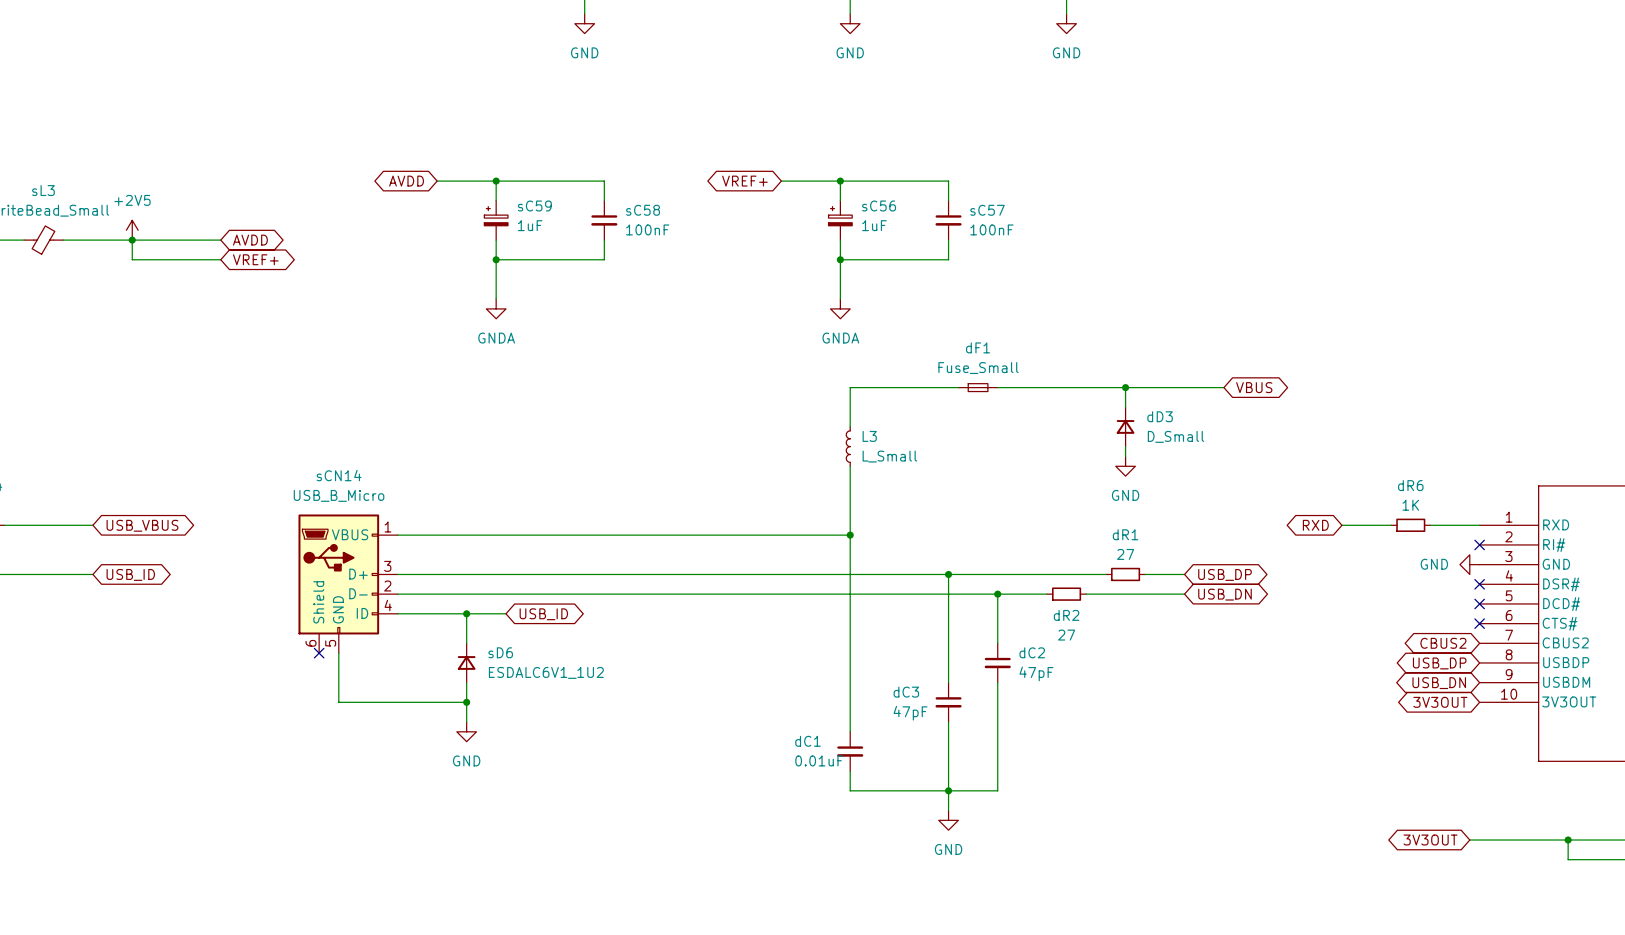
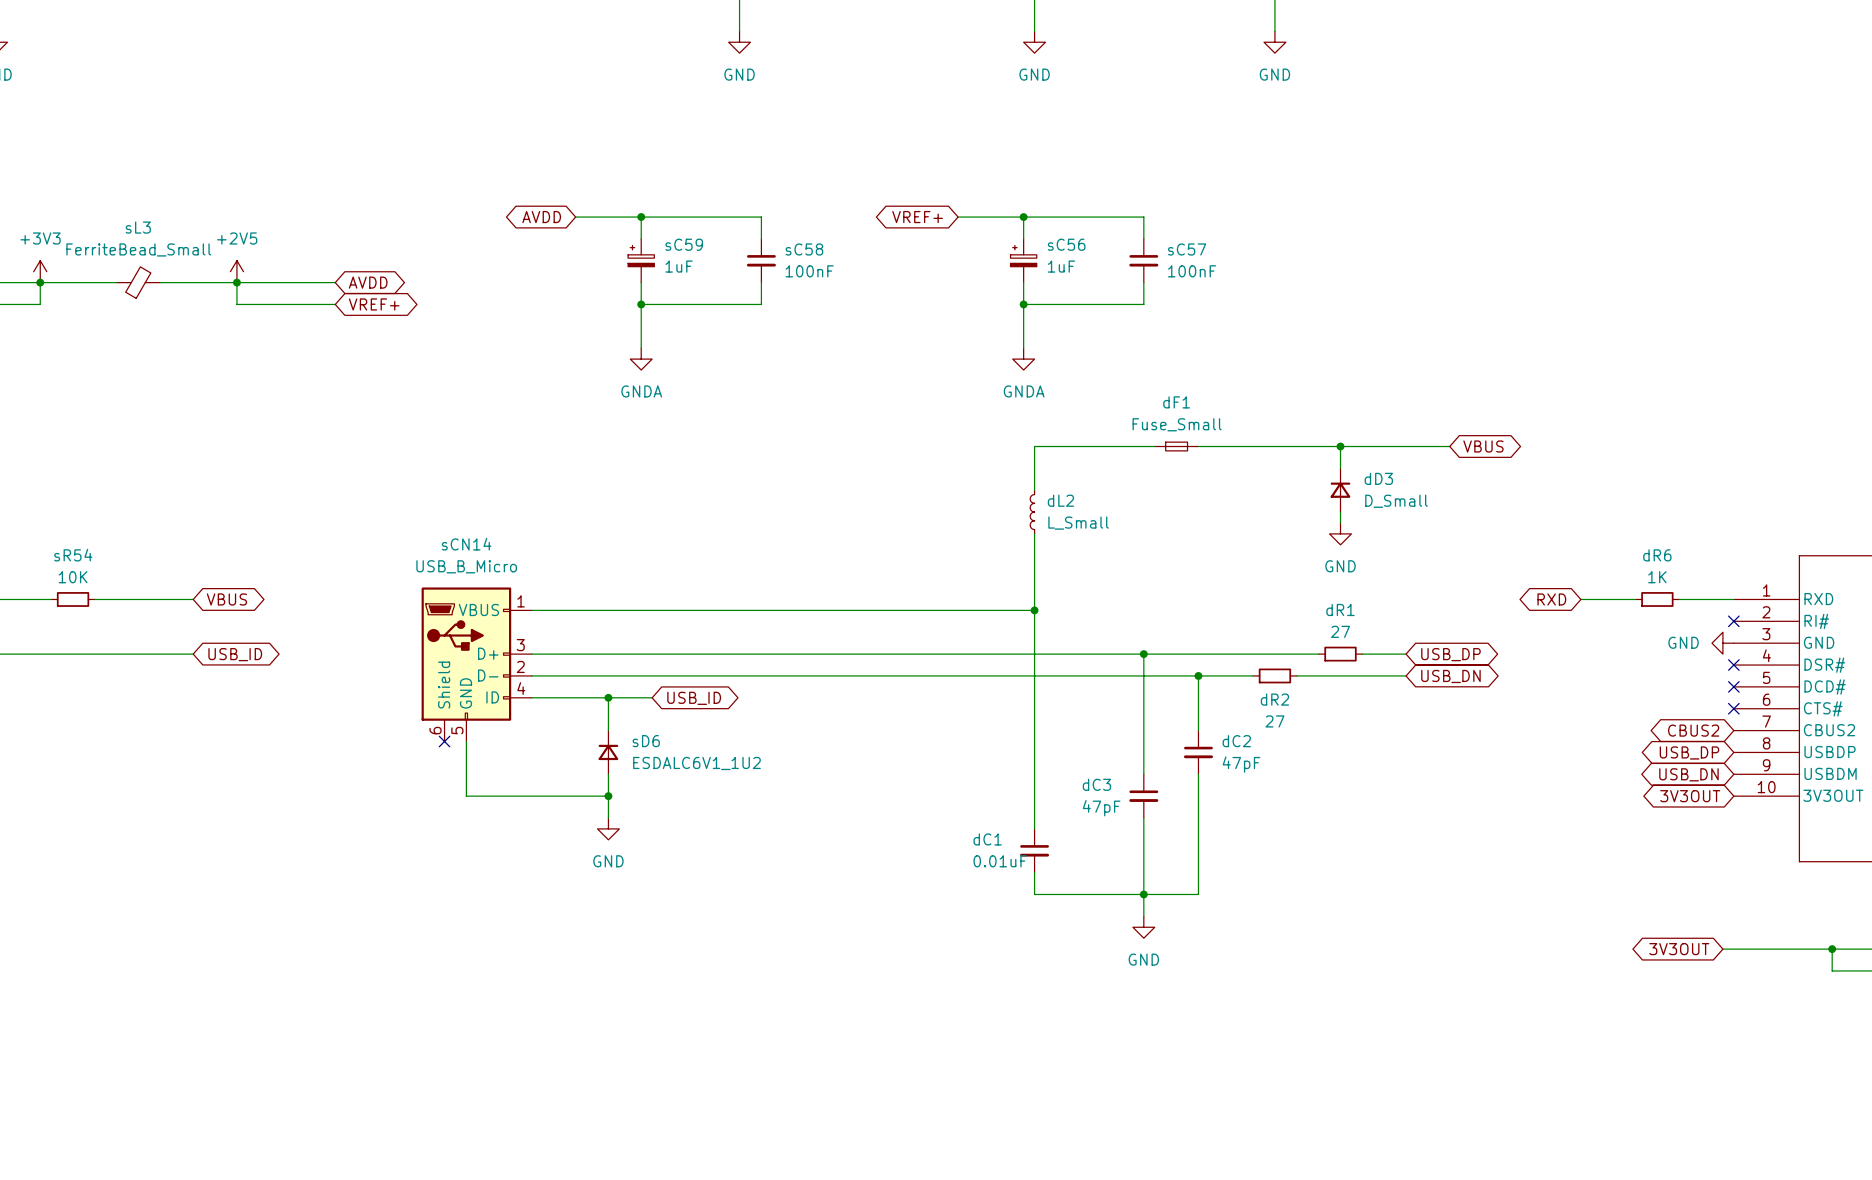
L3 name: L3 (869, 436) -> dL2 (1060, 500)
global label: USB_VBUS (142, 525) -> VBUS (226, 599)

